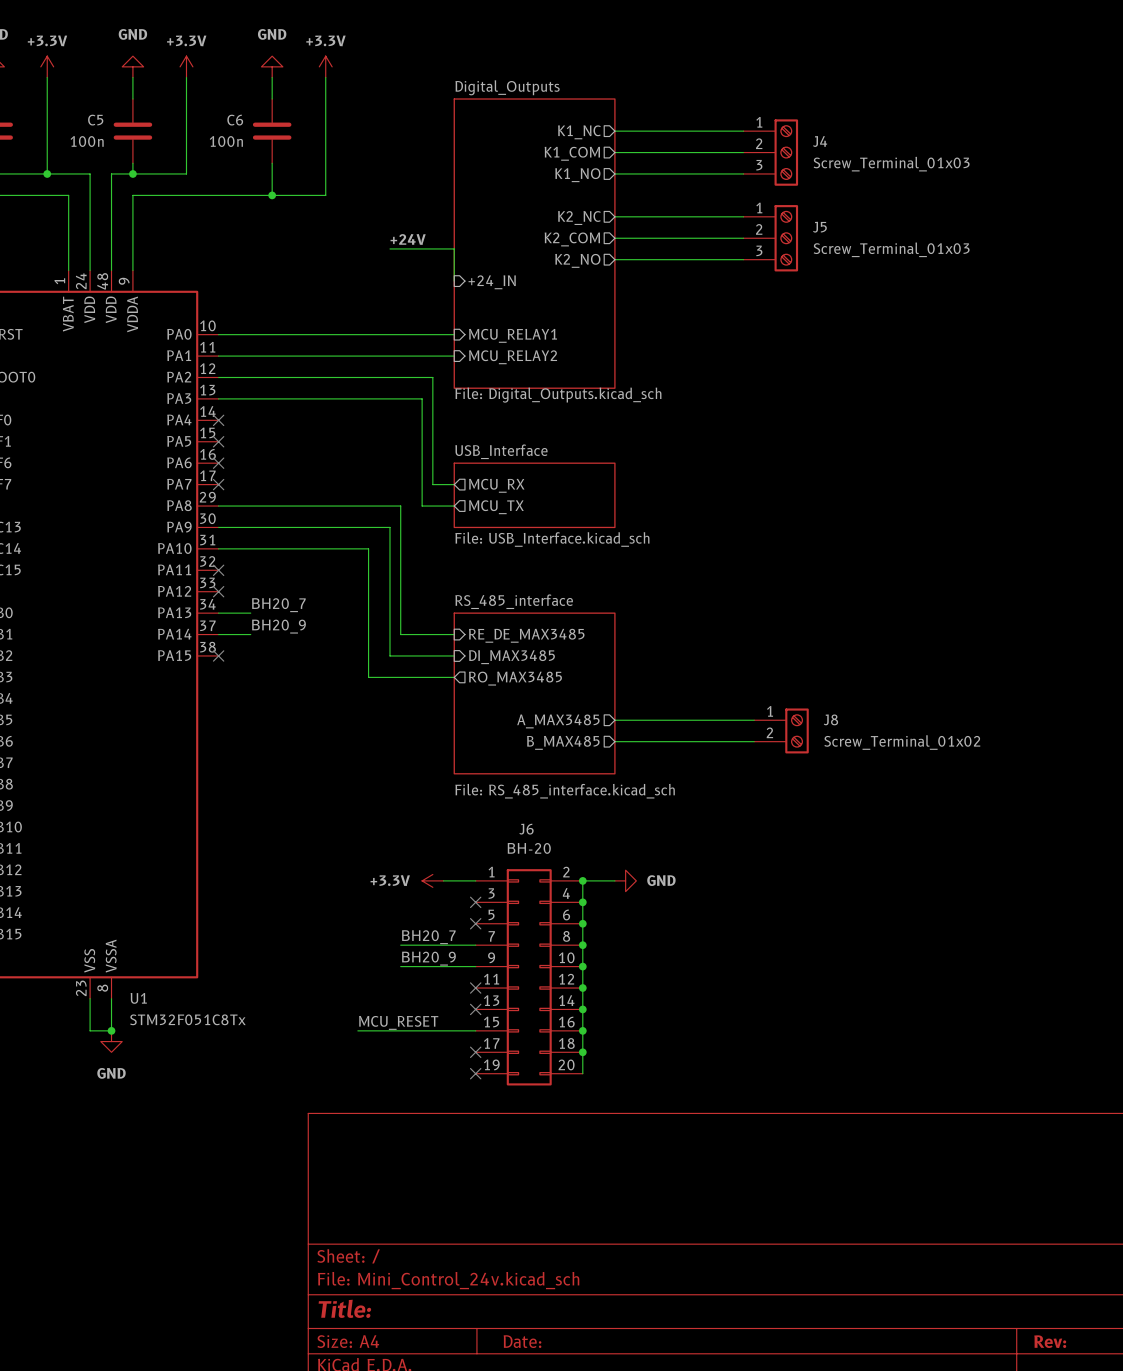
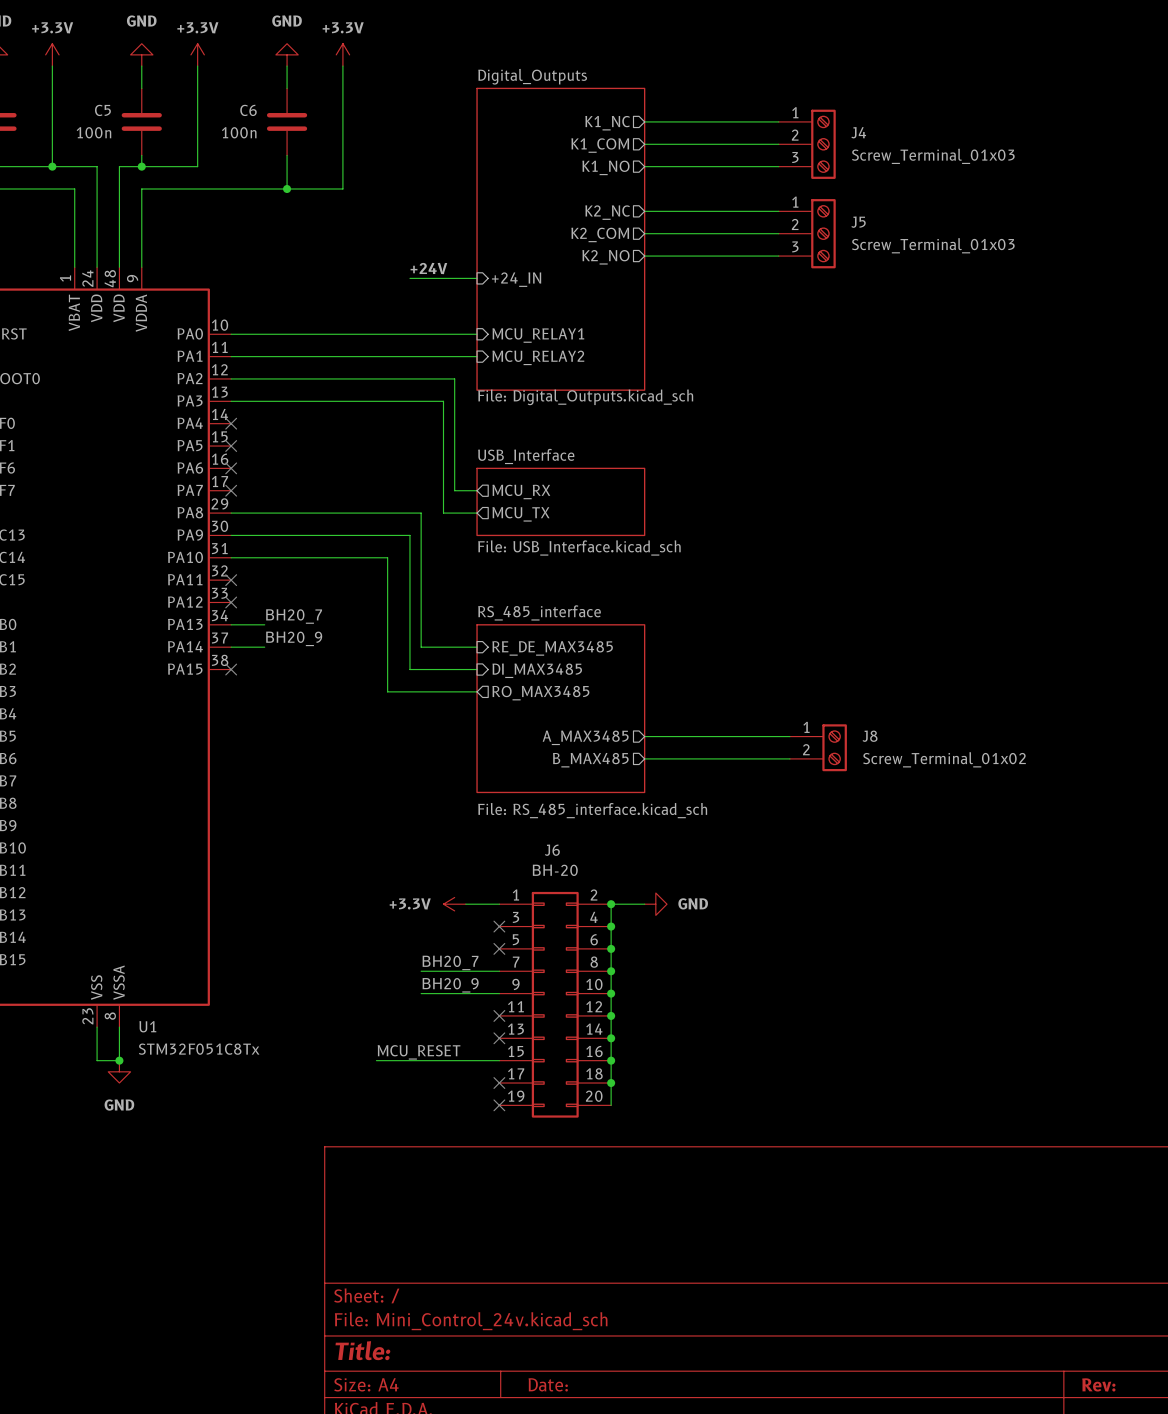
label position: +24V (408, 239) -> +24V (428, 268)
wire: (389, 248) (454, 248) (454, 281) -> (409, 278) (477, 278)

